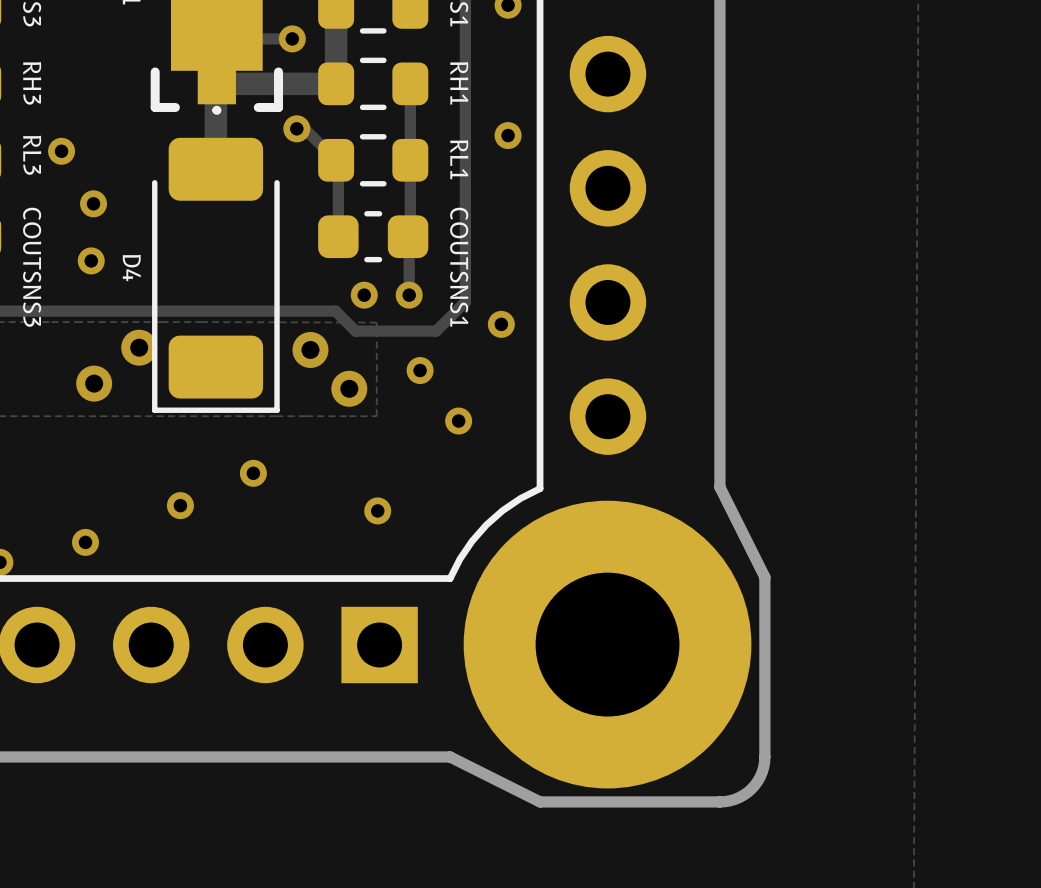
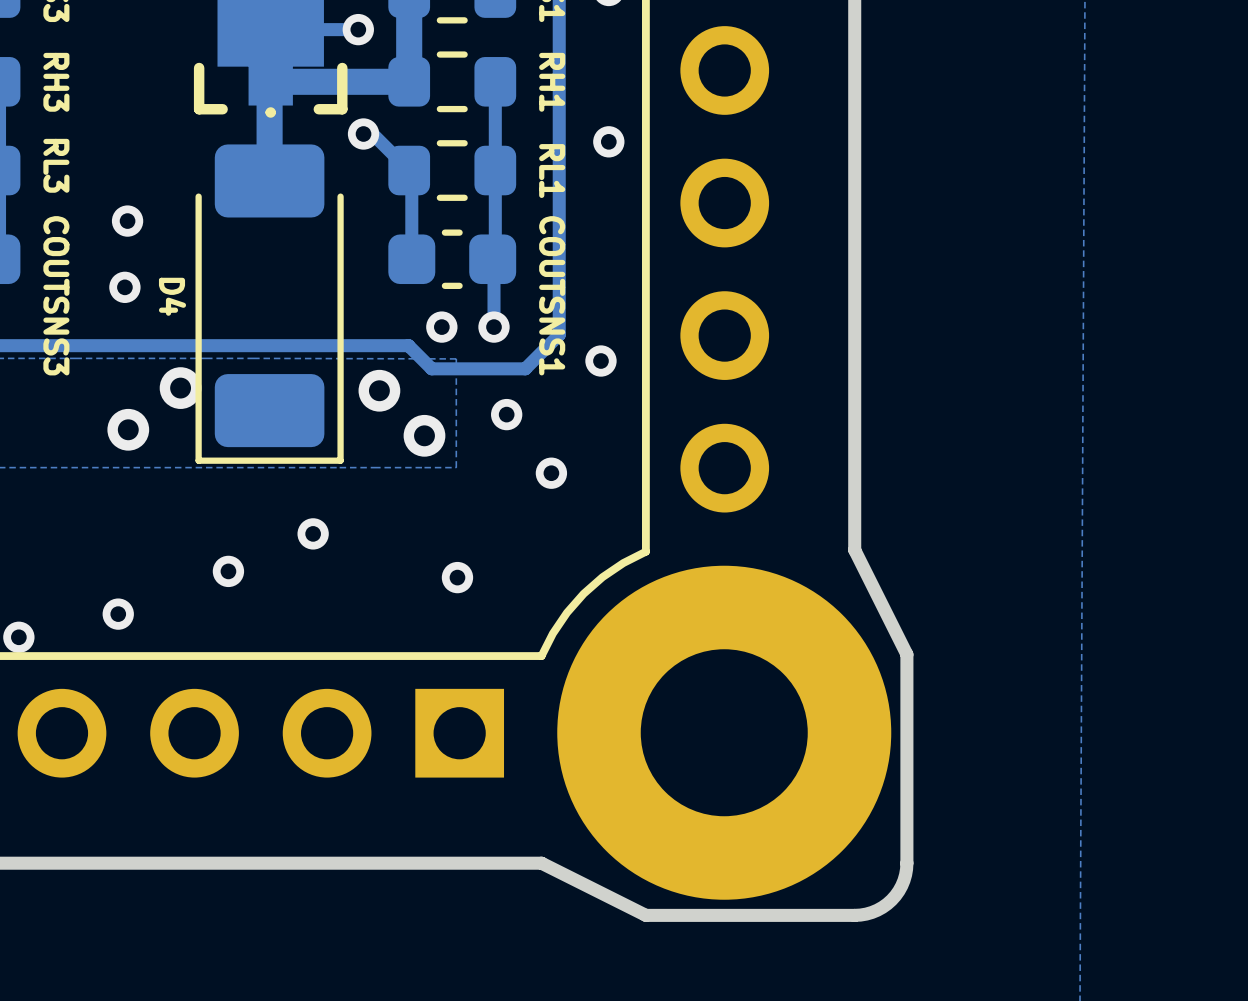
via: (61, 151) -> none

